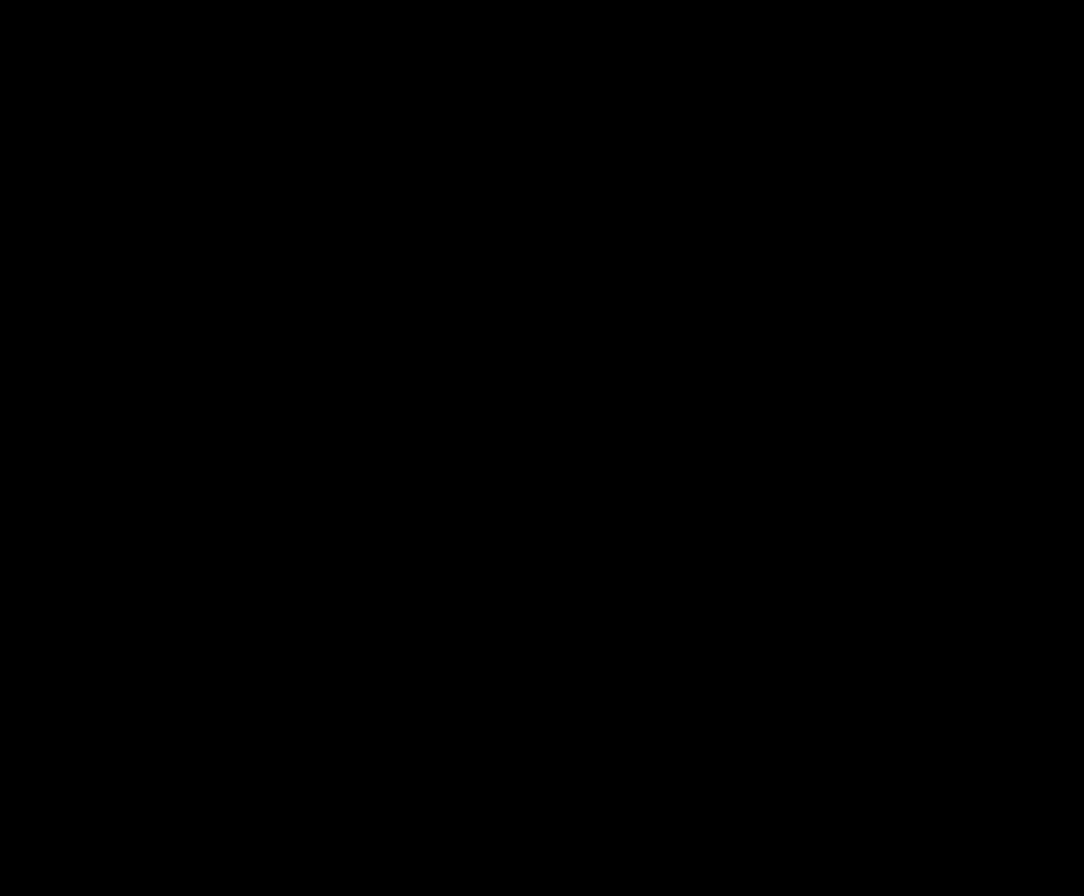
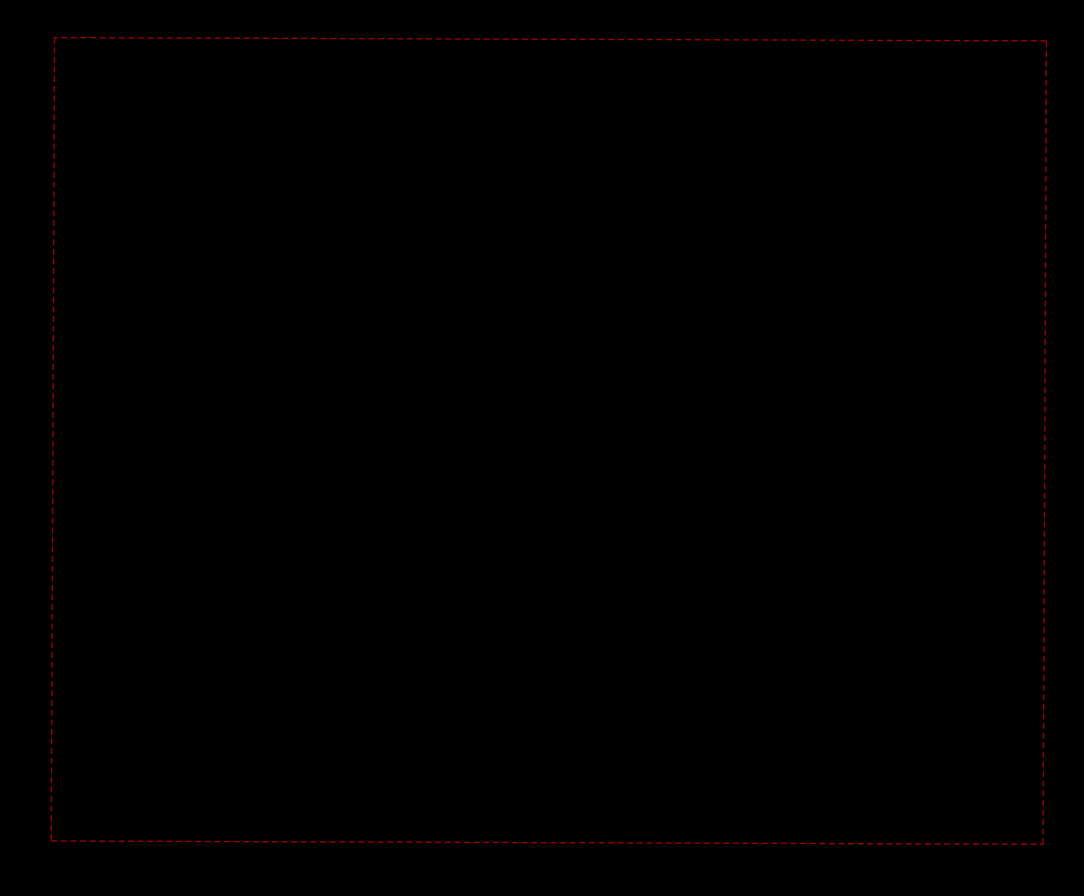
zone outline: none -> (54, 37) (51, 840) (1043, 844) (1046, 40) (54, 37)

